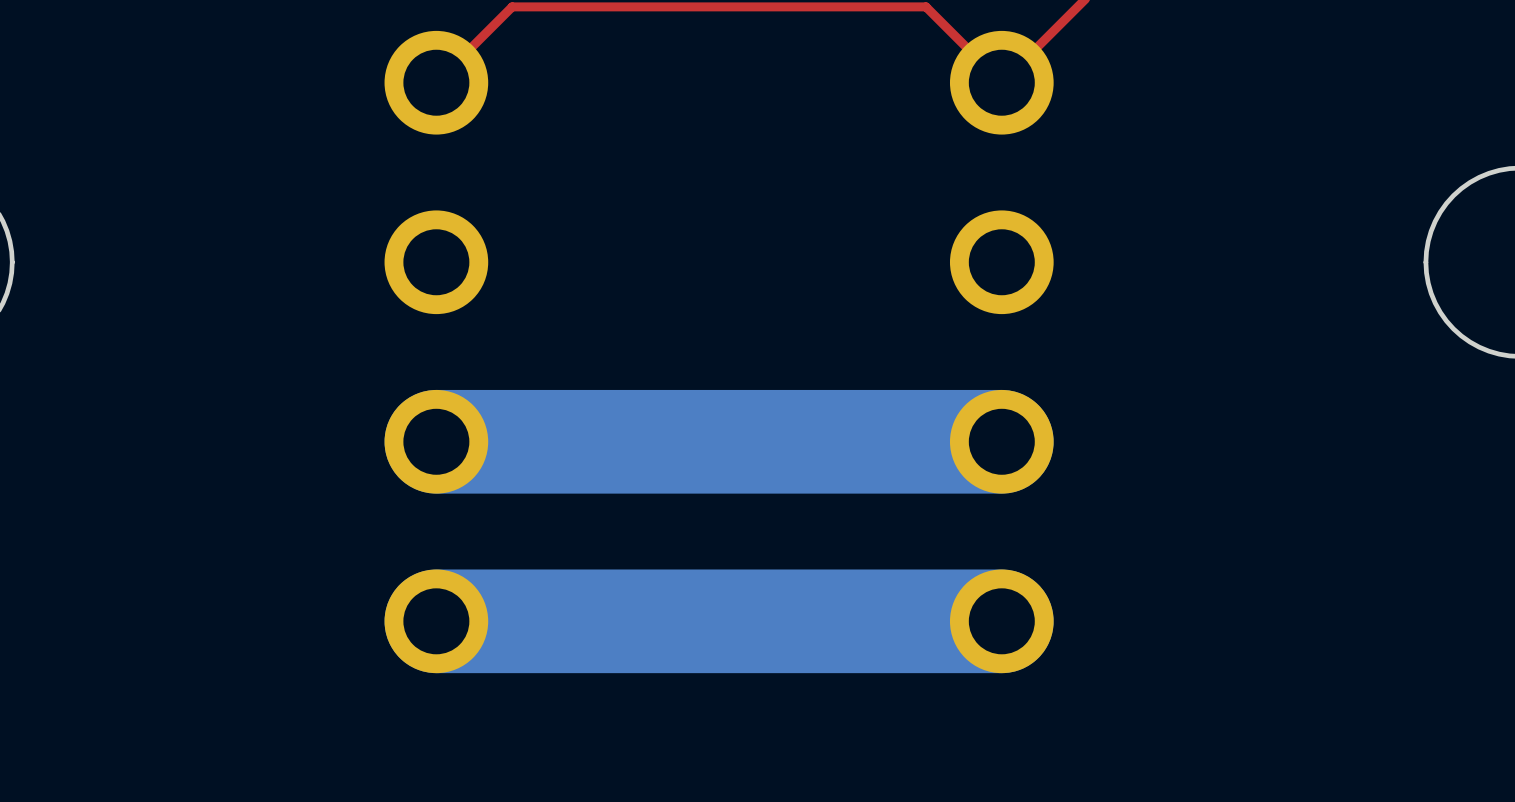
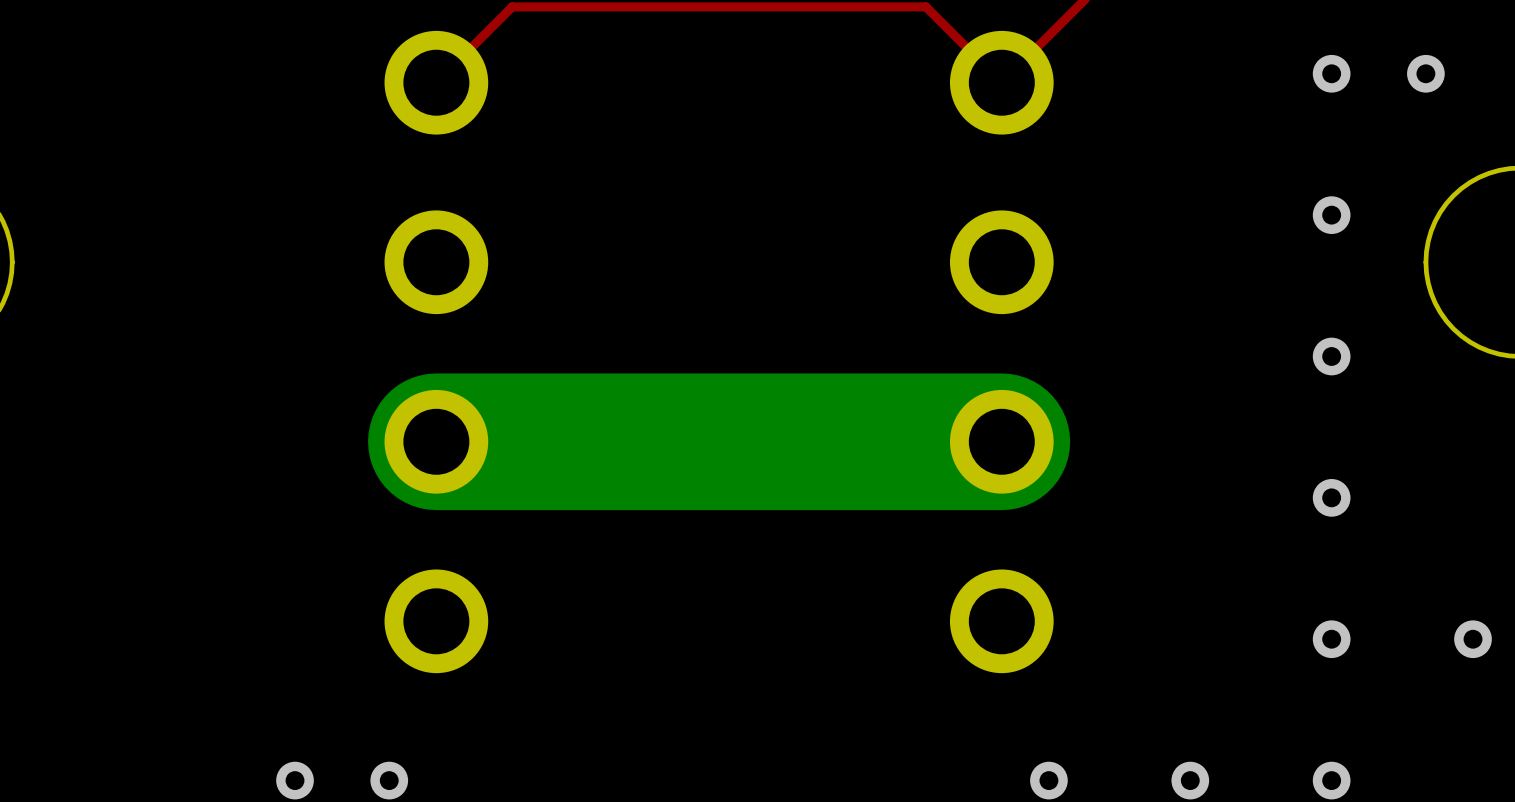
via: none -> (1331, 73)
via: none -> (1425, 73)
via: none -> (1331, 215)
via: none -> (1331, 356)
bottom track width: thin (1001, 441) (436, 441) -> thick (1001, 441) (436, 441)
via: none -> (1331, 497)
bottom track: (1001, 621) (436, 621) -> none
via: none -> (1331, 639)
via: none -> (1473, 639)
via: none -> (295, 780)
via: none -> (389, 780)
via: none -> (1048, 780)
via: none -> (1190, 780)
via: none -> (1331, 780)

